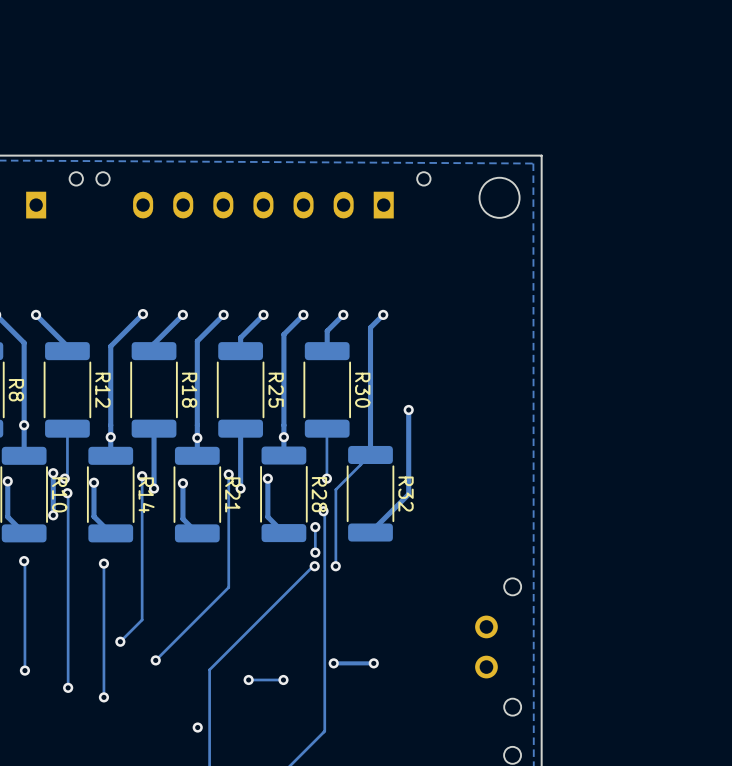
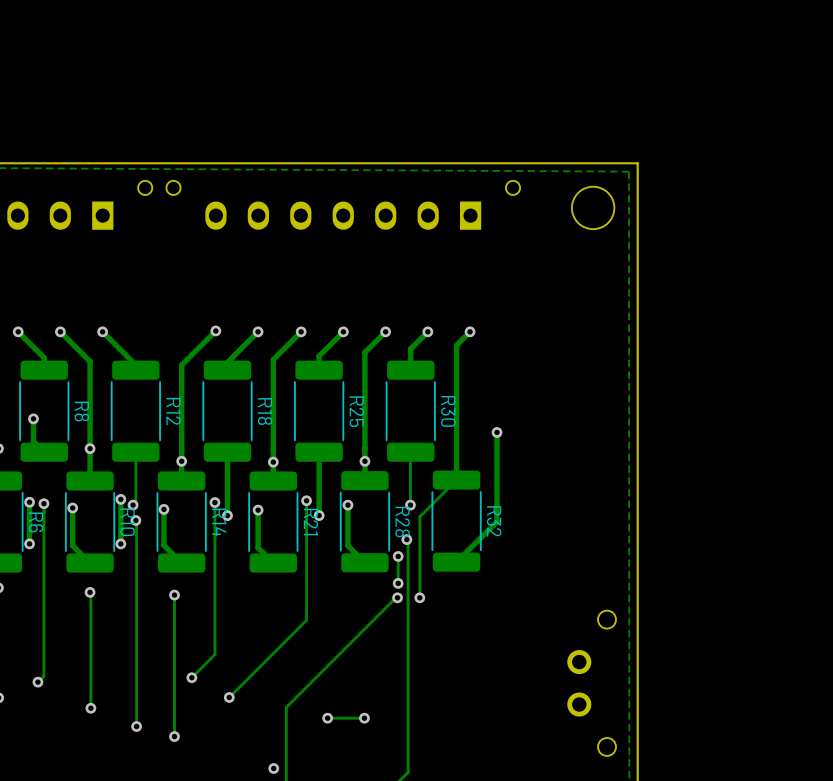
via: (333, 663) -> none
track: (373, 663) (333, 663) -> none
via: (373, 663) -> none

